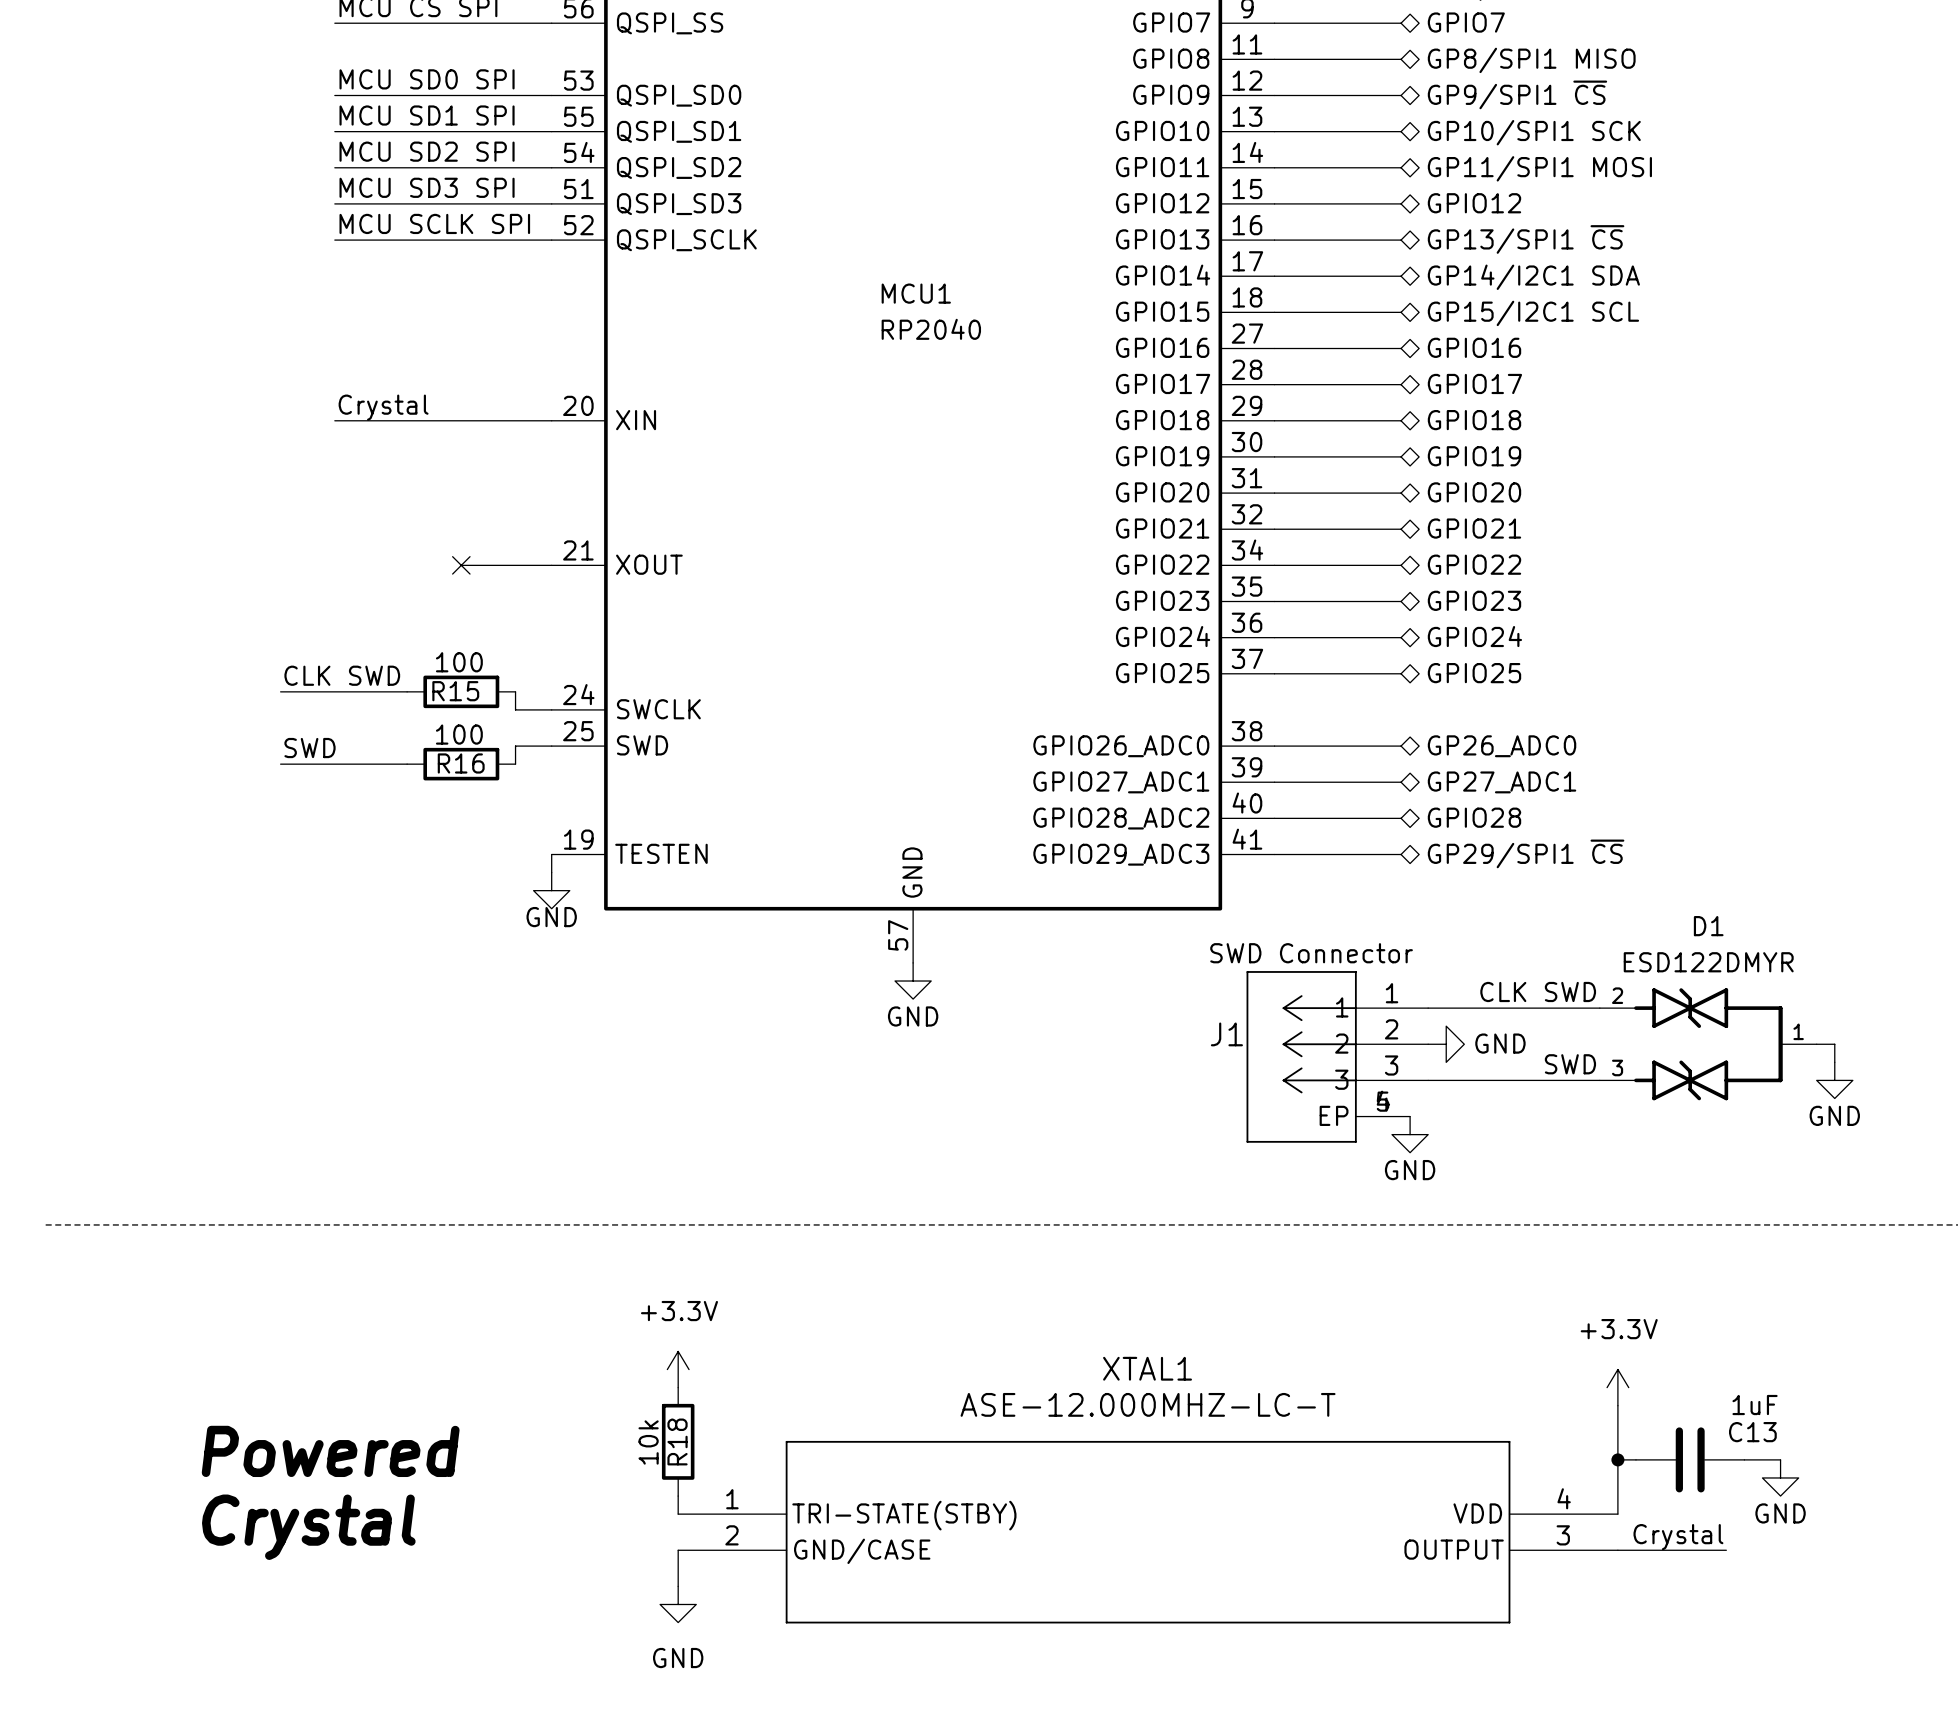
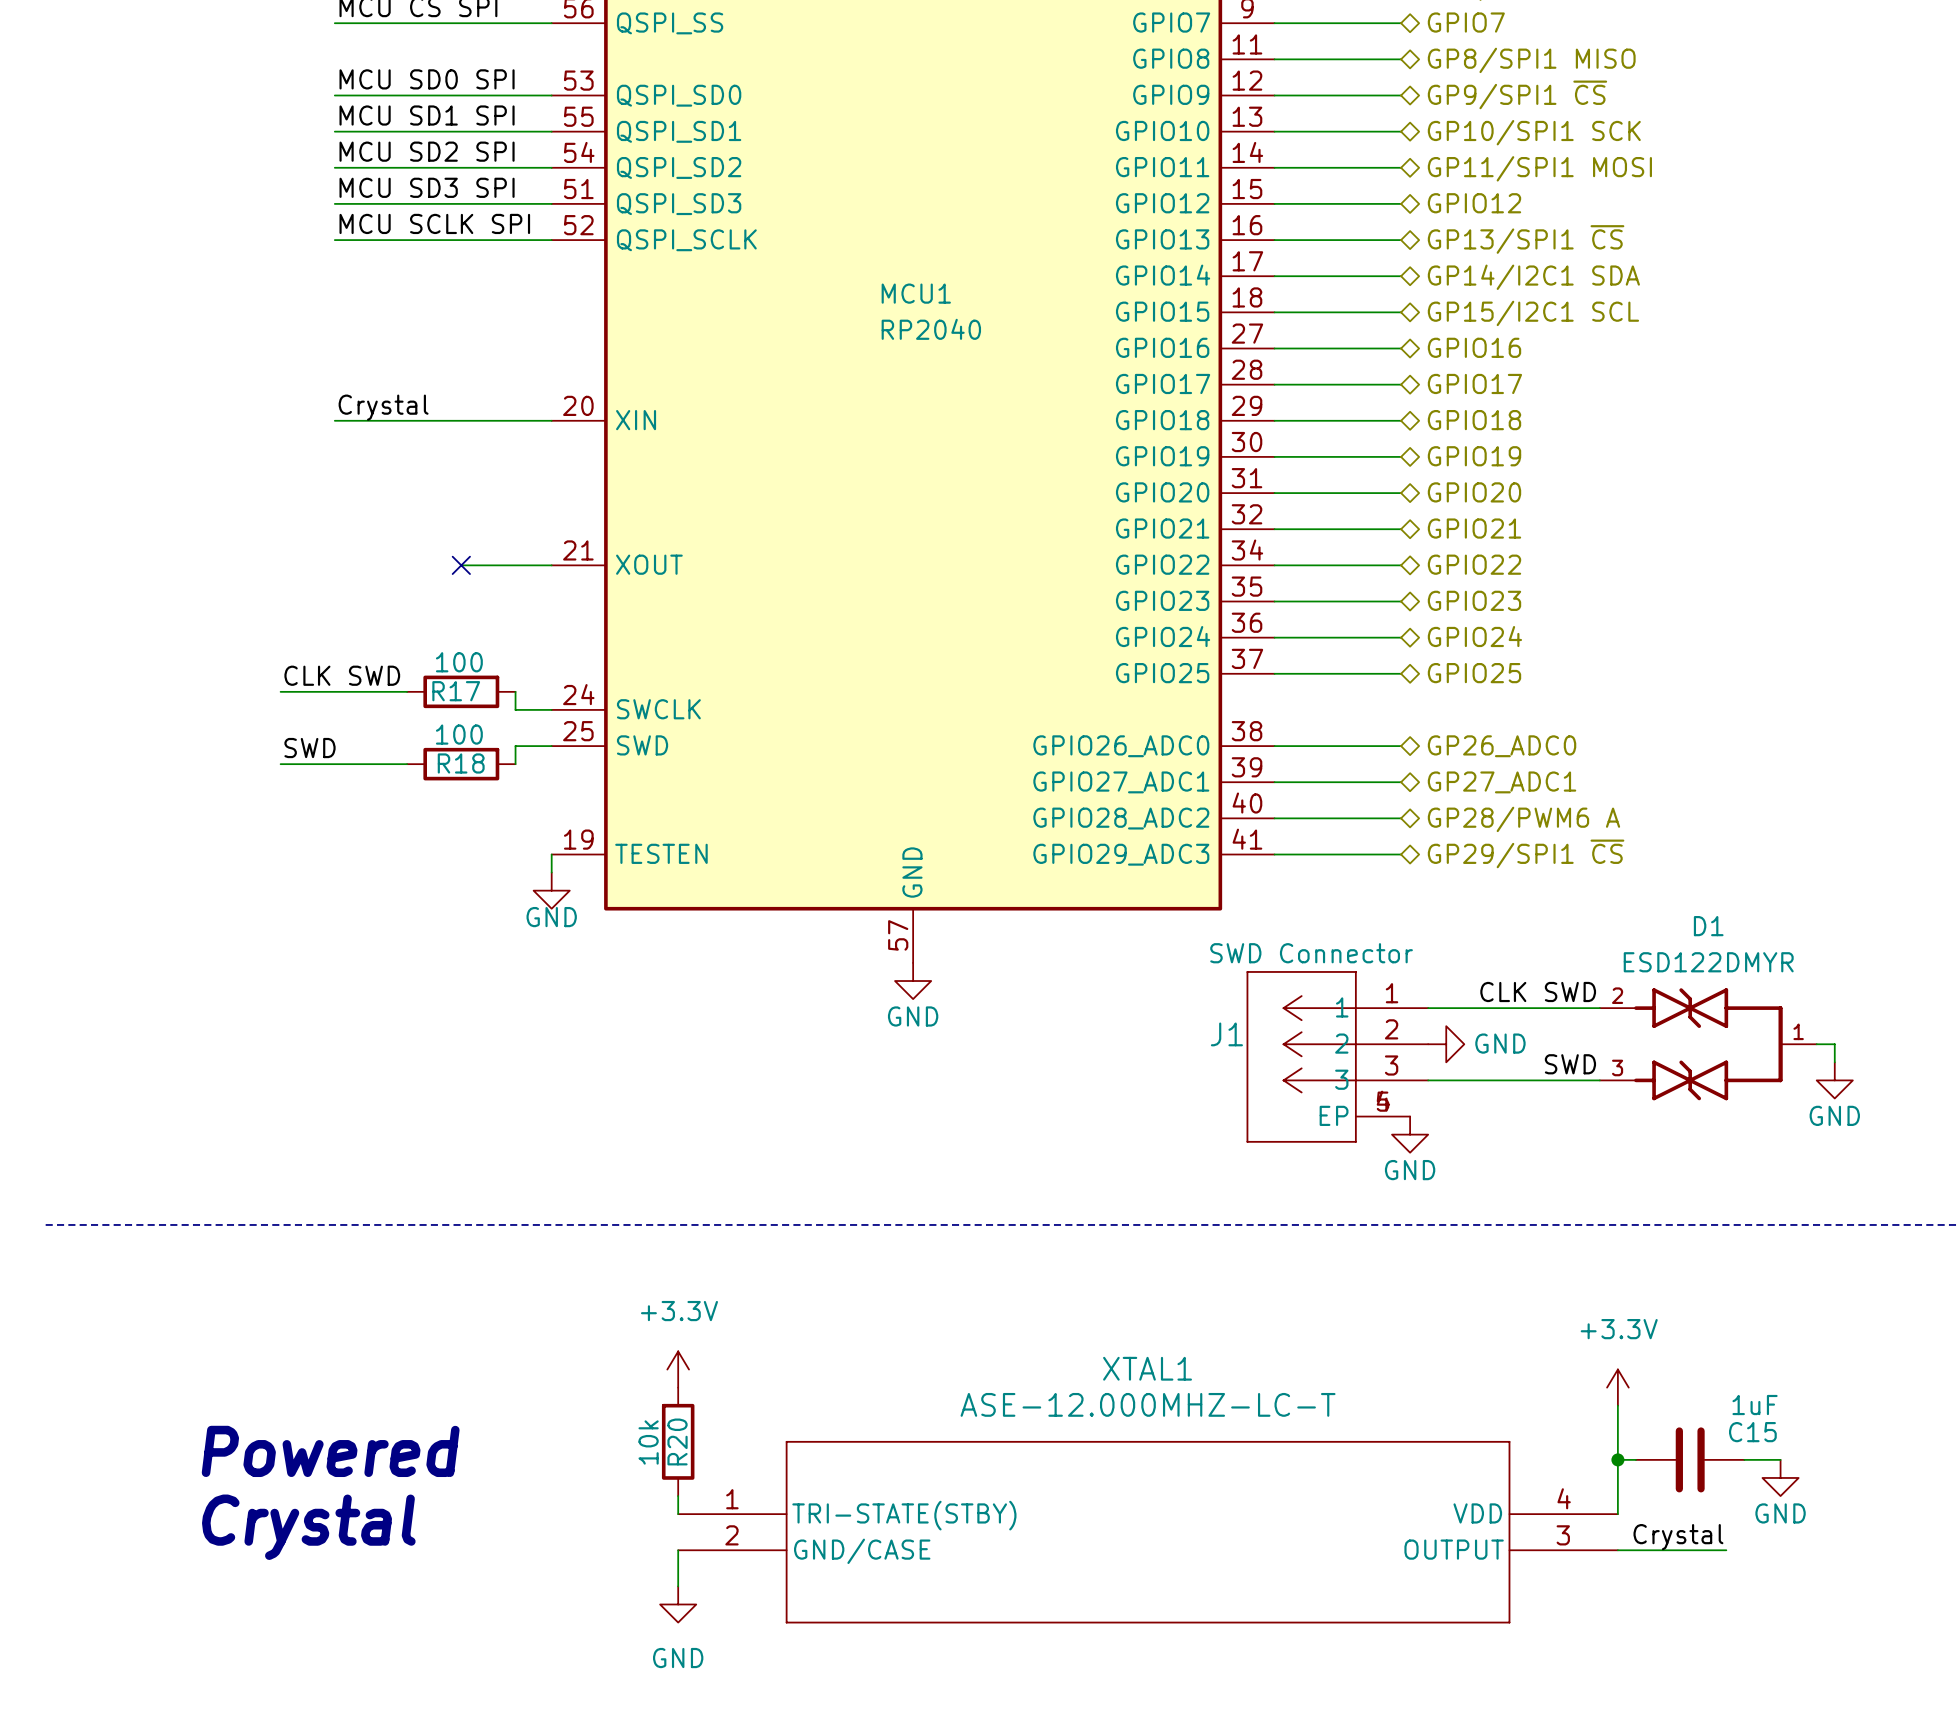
R15 name: R15 (455, 691) -> R17 (456, 691)
R16 name: R16 (461, 763) -> R18 (461, 763)
hierarchical label: GPIO28 (1474, 817) -> GP28/PWM6 A (1523, 819)
C13 name: C13 (1752, 1432) -> C15 (1752, 1432)
R18 name: R18 (677, 1441) -> R20 (677, 1441)

